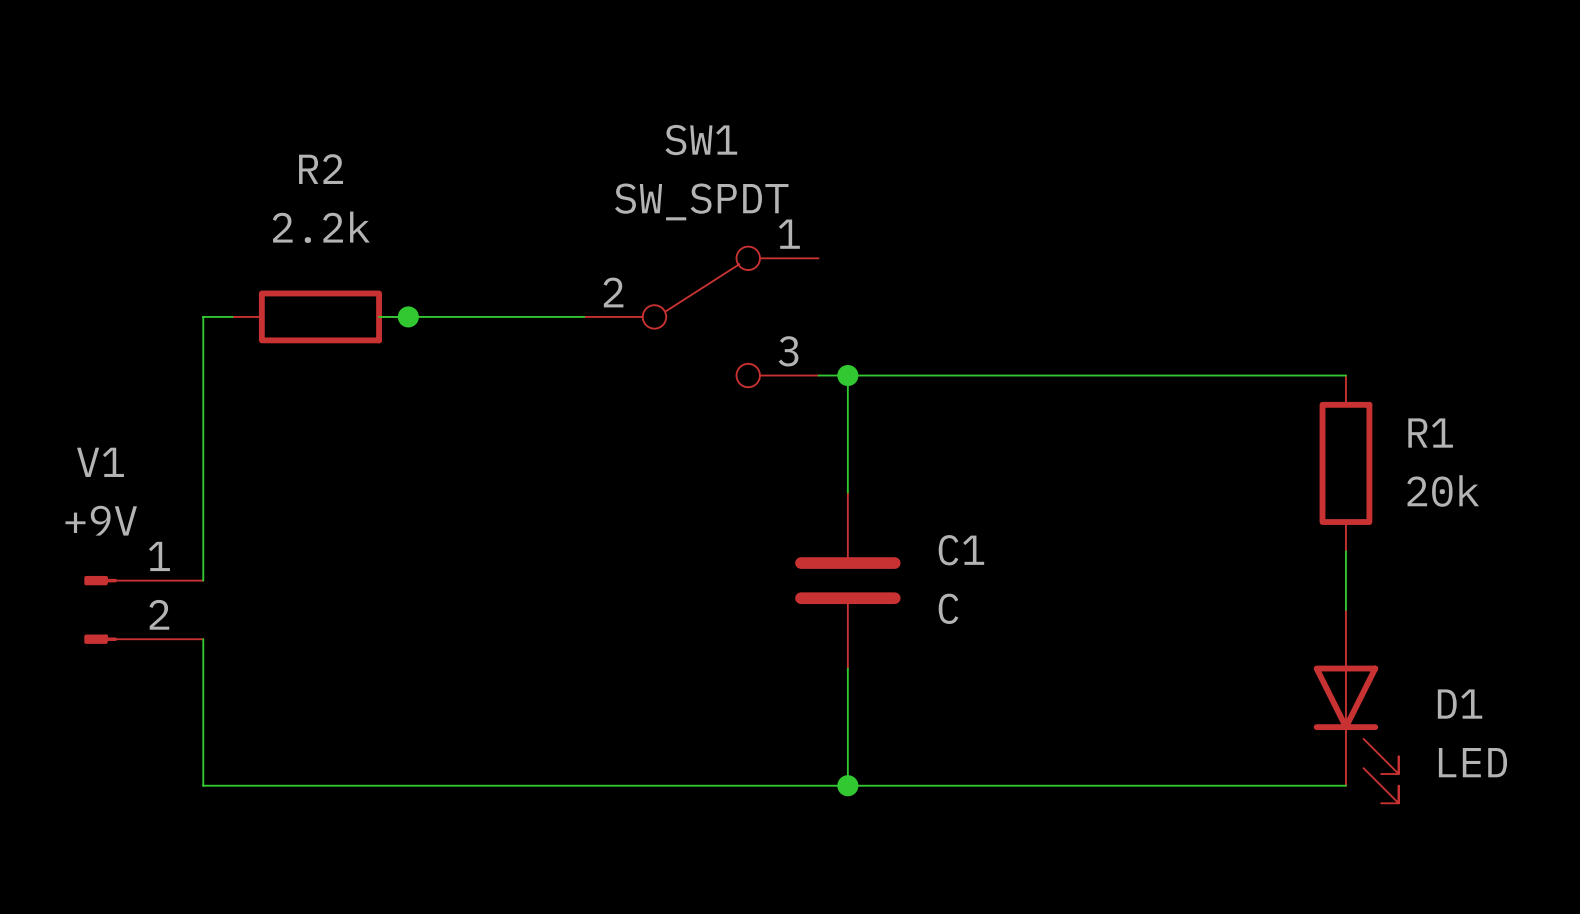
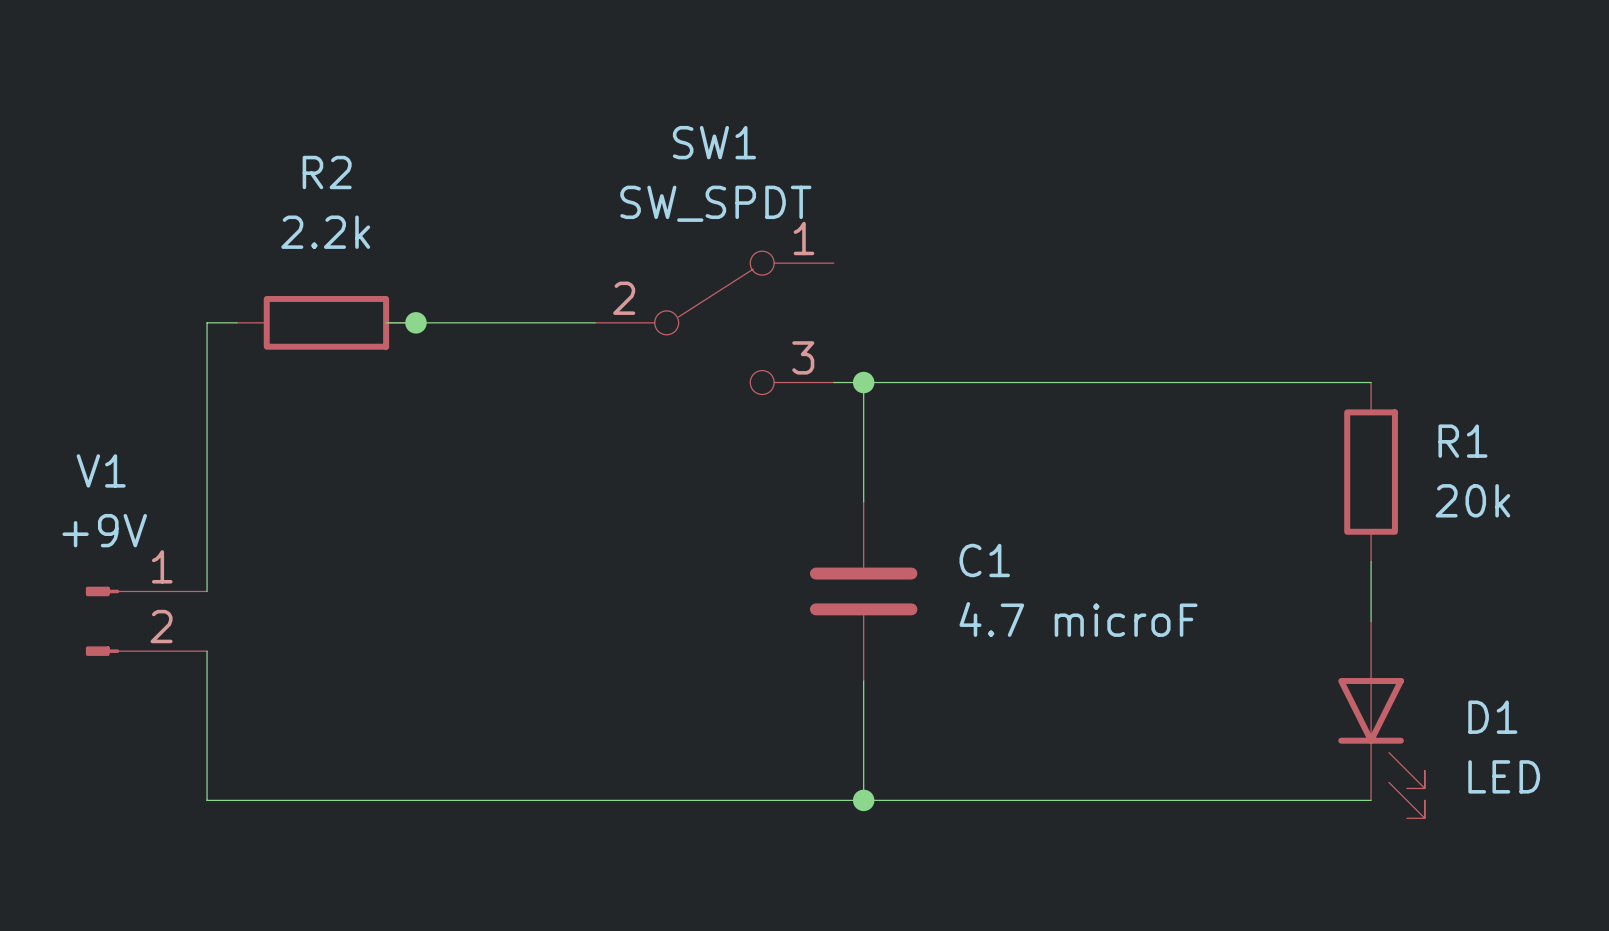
C1 value: C (948, 608) -> 4.7 microF (1078, 619)

